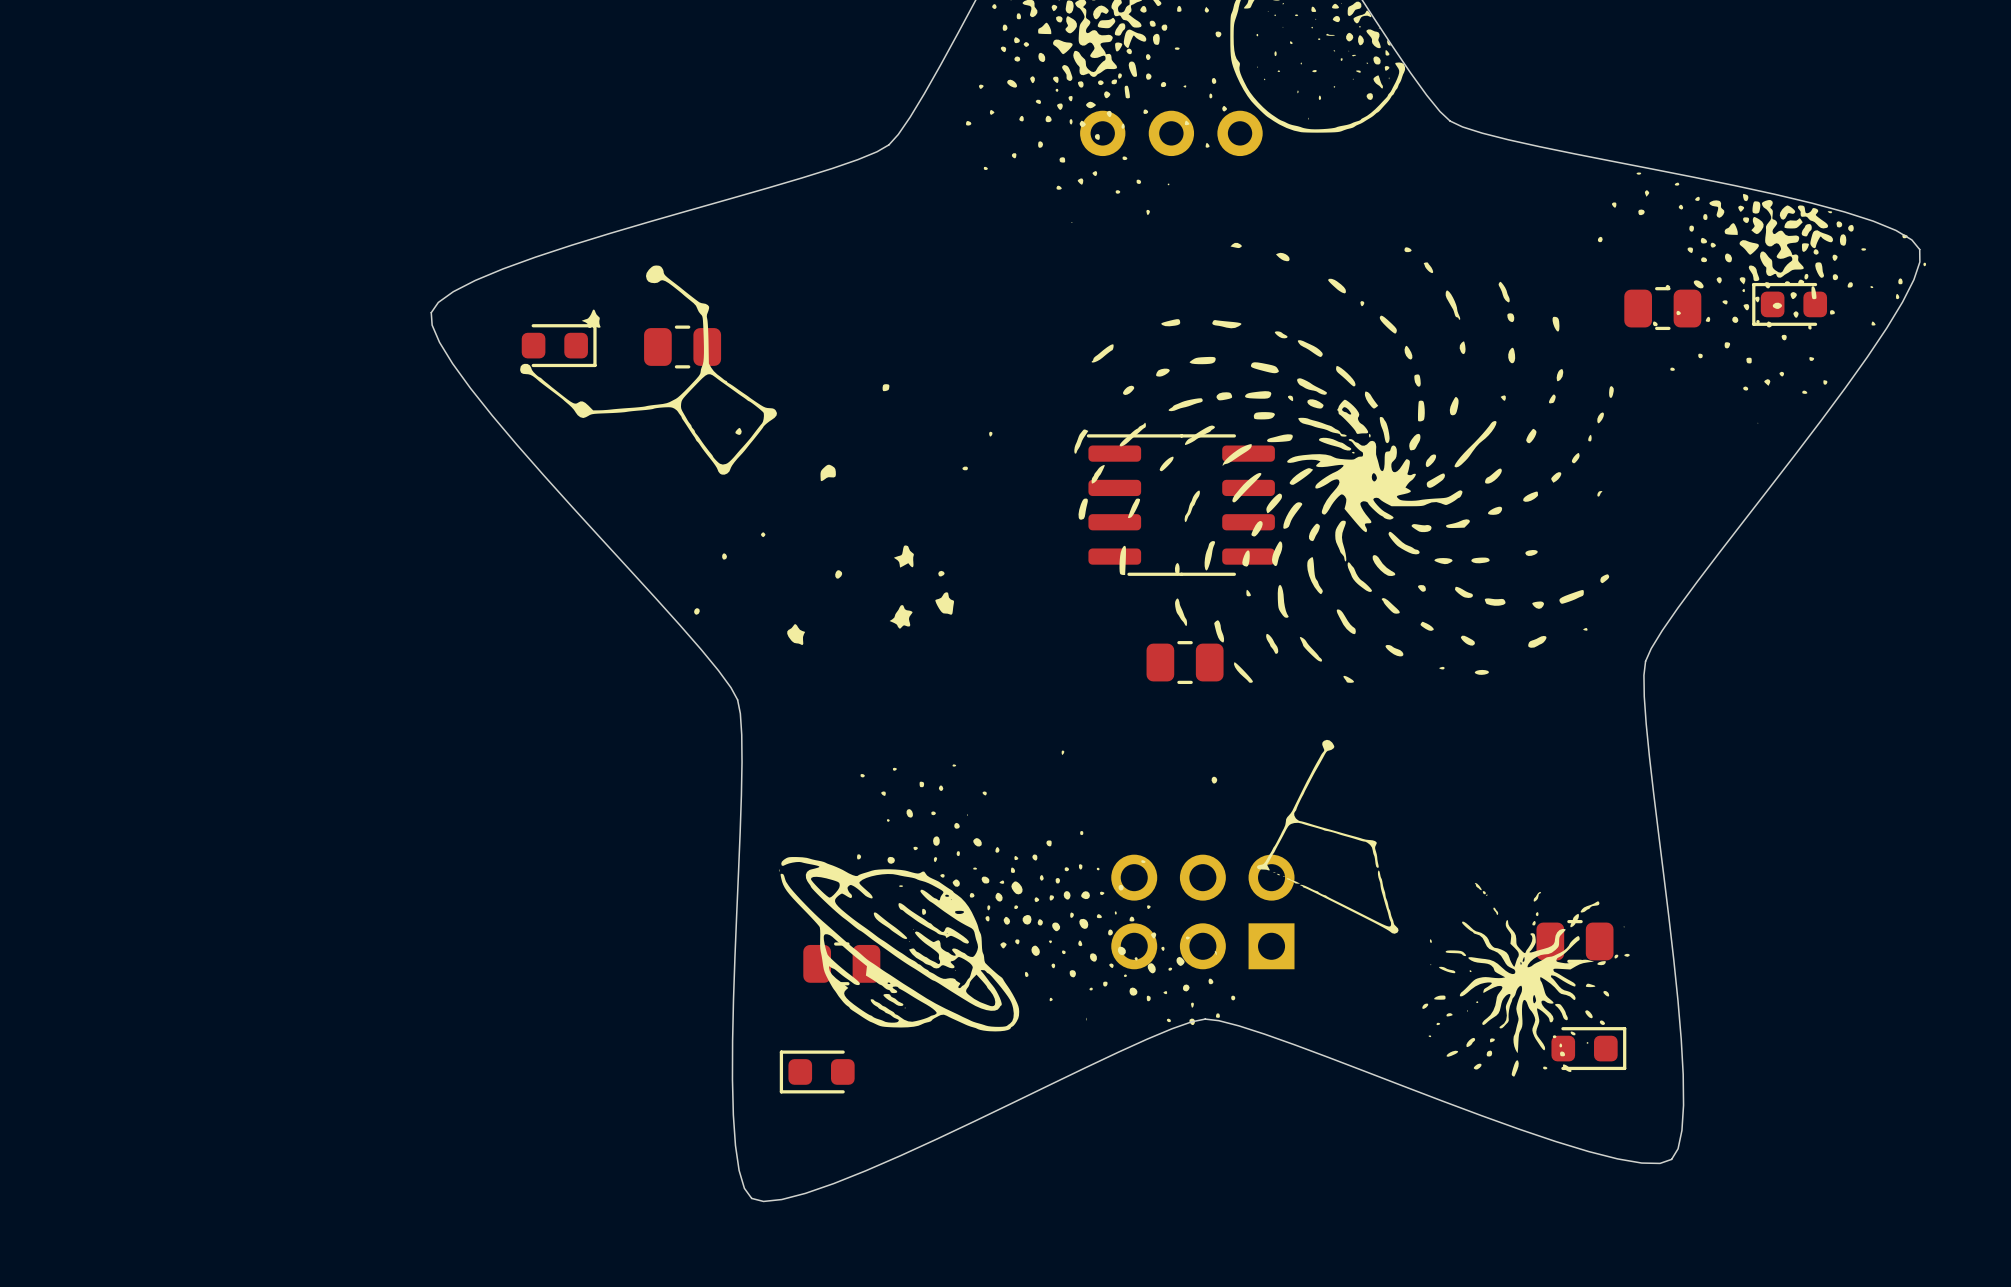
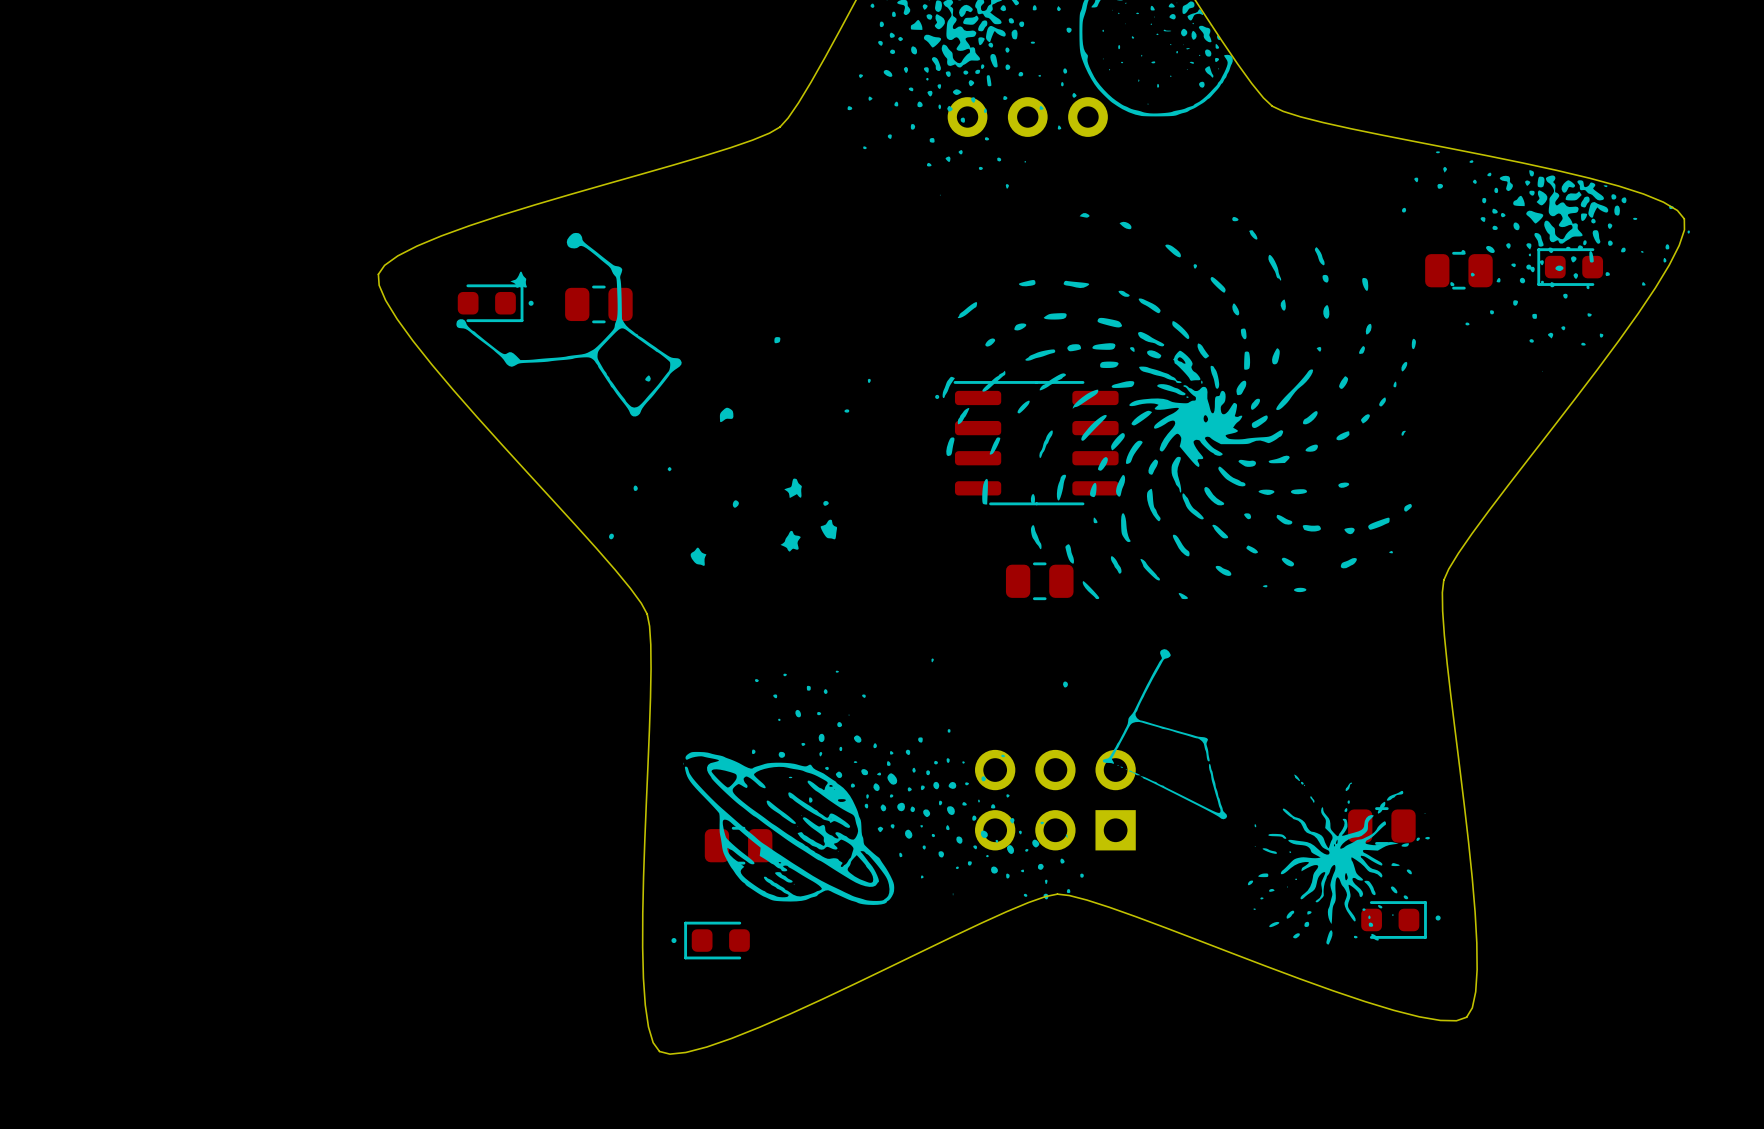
drawing: none -> [1526, 264, 1532, 270]
drawing: none -> [528, 300, 534, 306]
drawing: none -> [935, 394, 940, 399]
drawing: none -> [1435, 915, 1441, 921]
drawing: none -> [671, 938, 677, 944]

